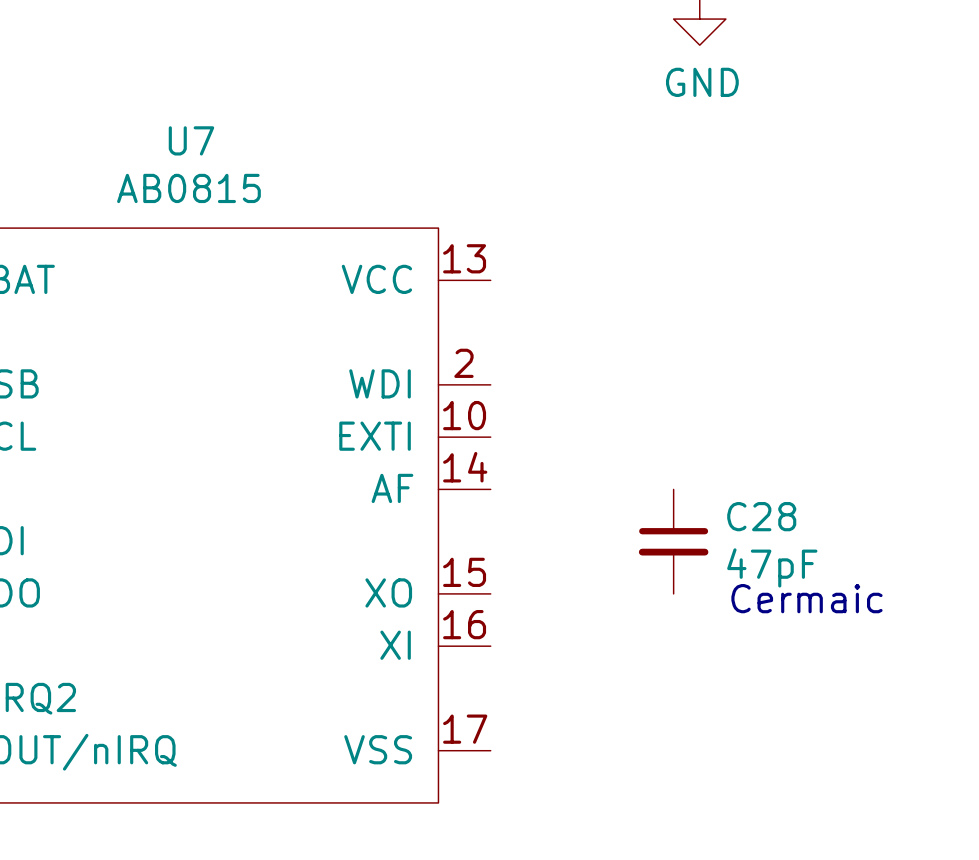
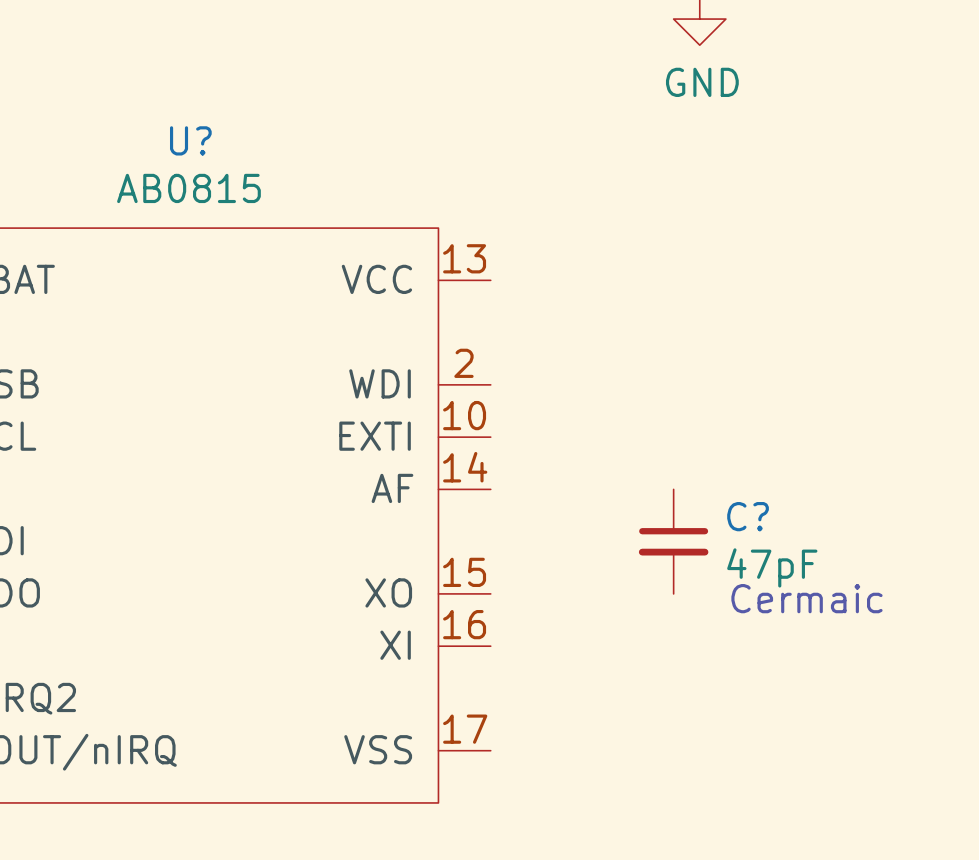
U7 name: U7 (191, 140) -> U? (190, 140)
C28 name: C28 (761, 516) -> C? (748, 516)

